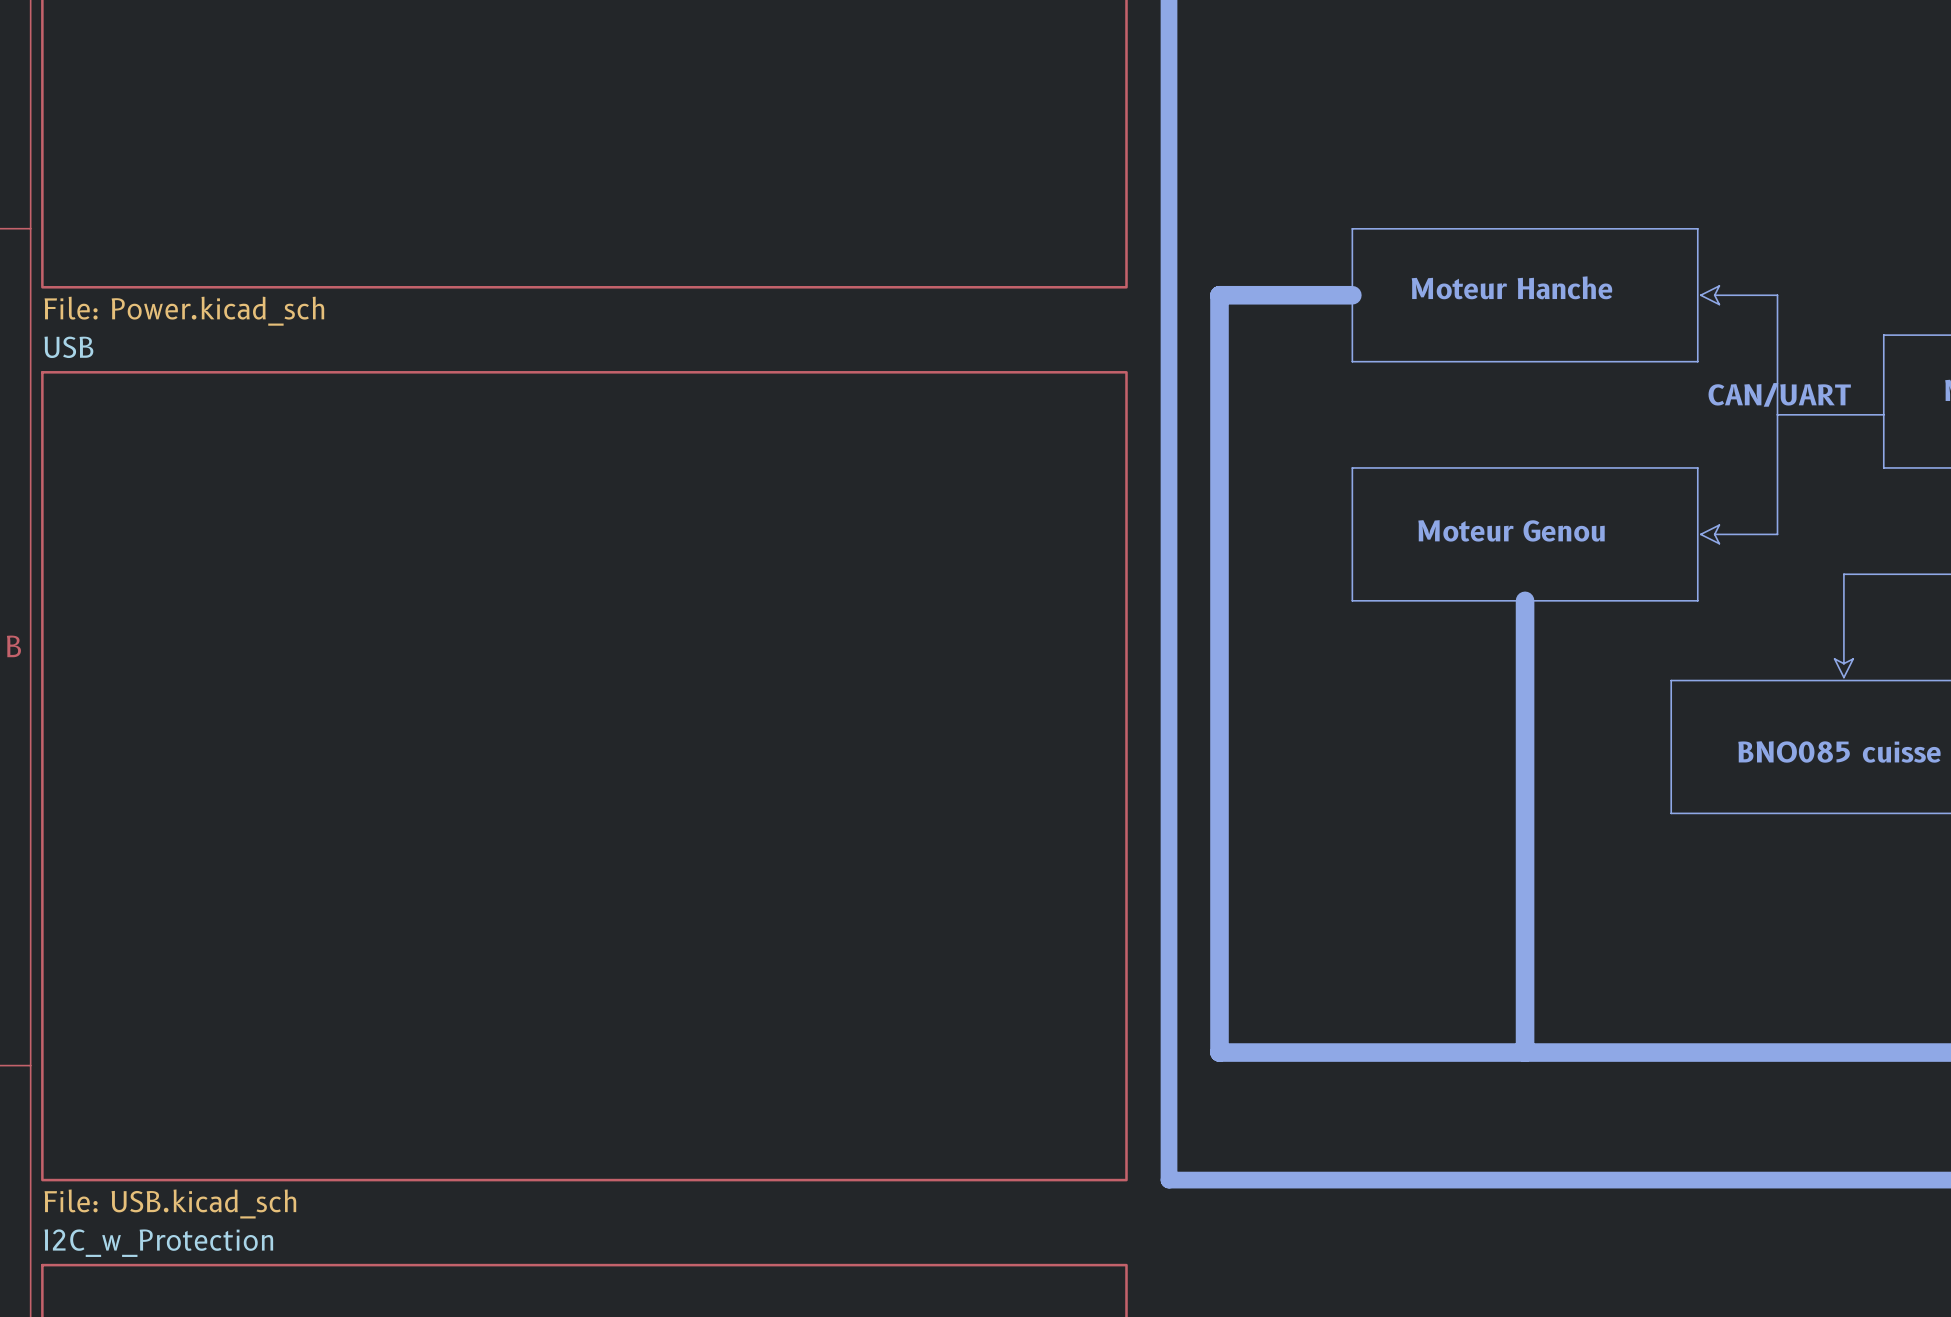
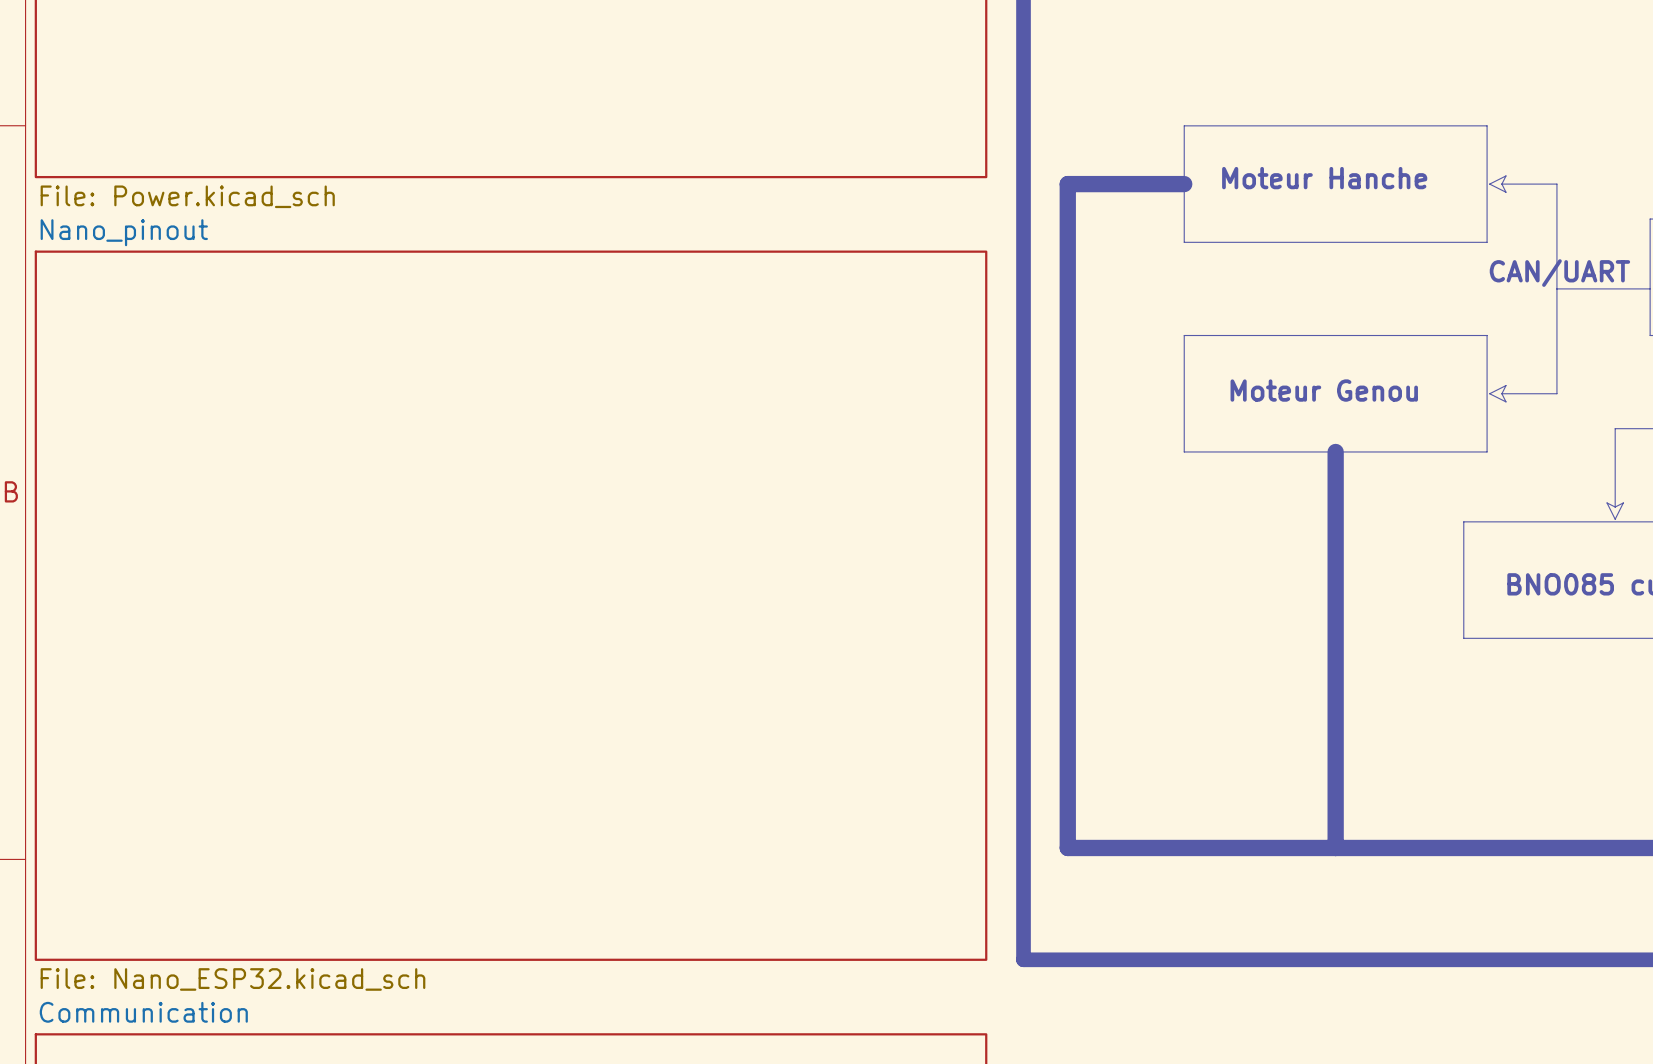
sheet USB name: USB (68, 347) -> Nano_pinout (124, 232)
sheet USB value: File: USB.kicad_sch (170, 1203) -> File: Nano_ESP32.kicad_sch (232, 979)
sheet I2C_w_Protection name: I2C_w_Protection (158, 1243) -> Communication (143, 1012)

